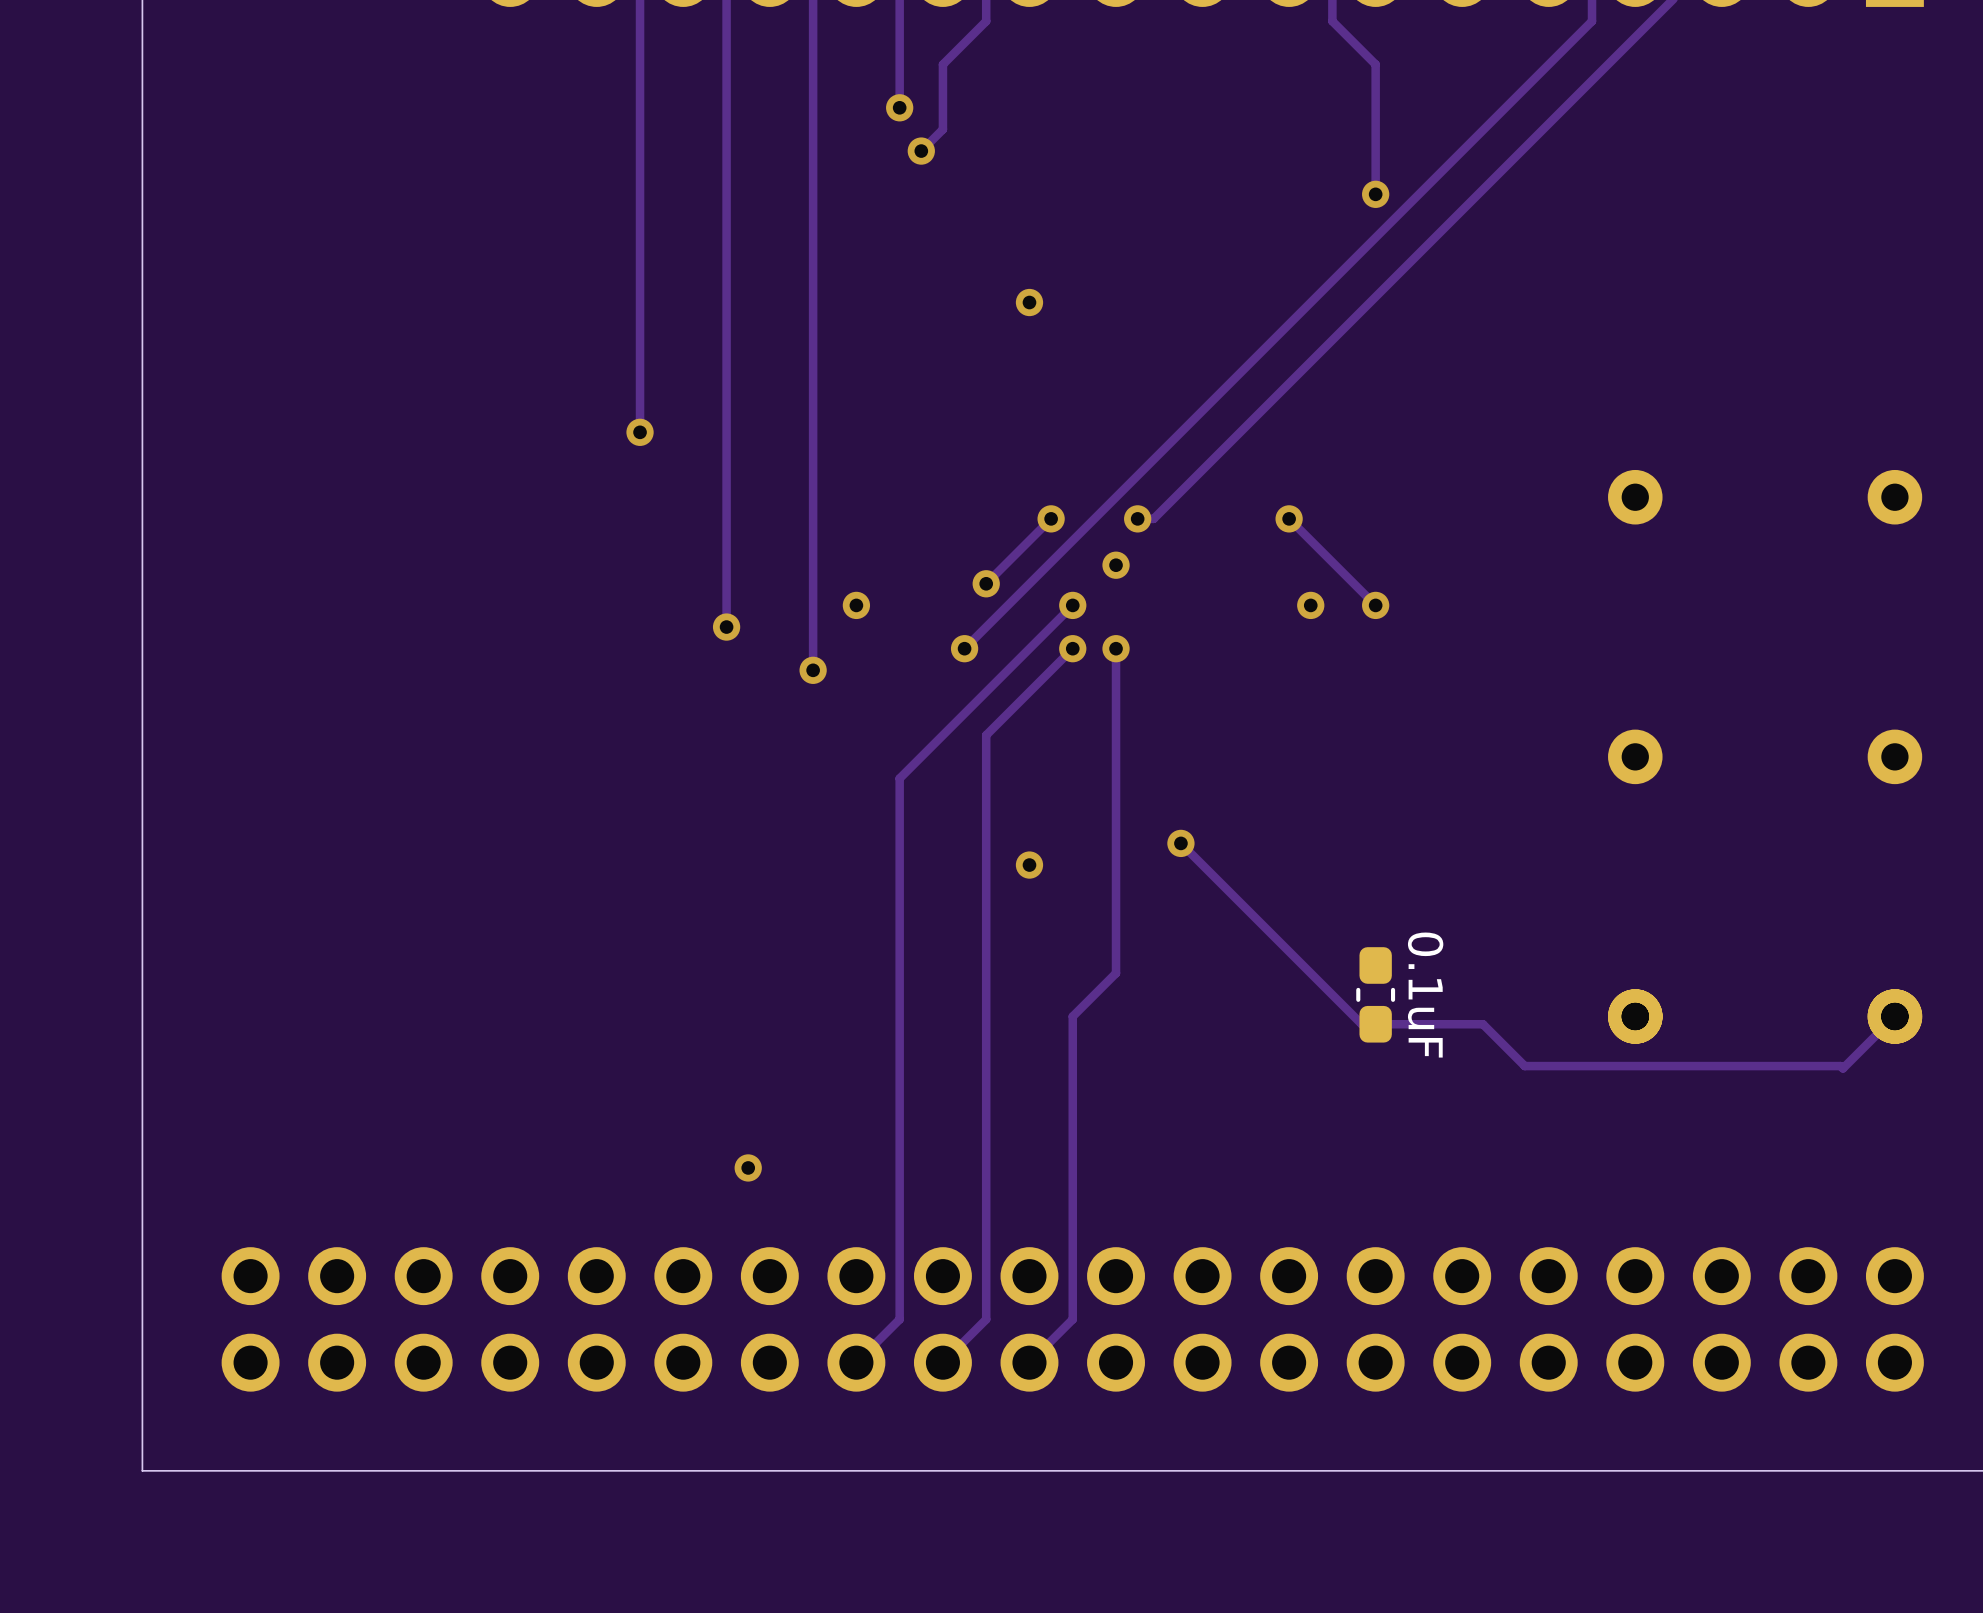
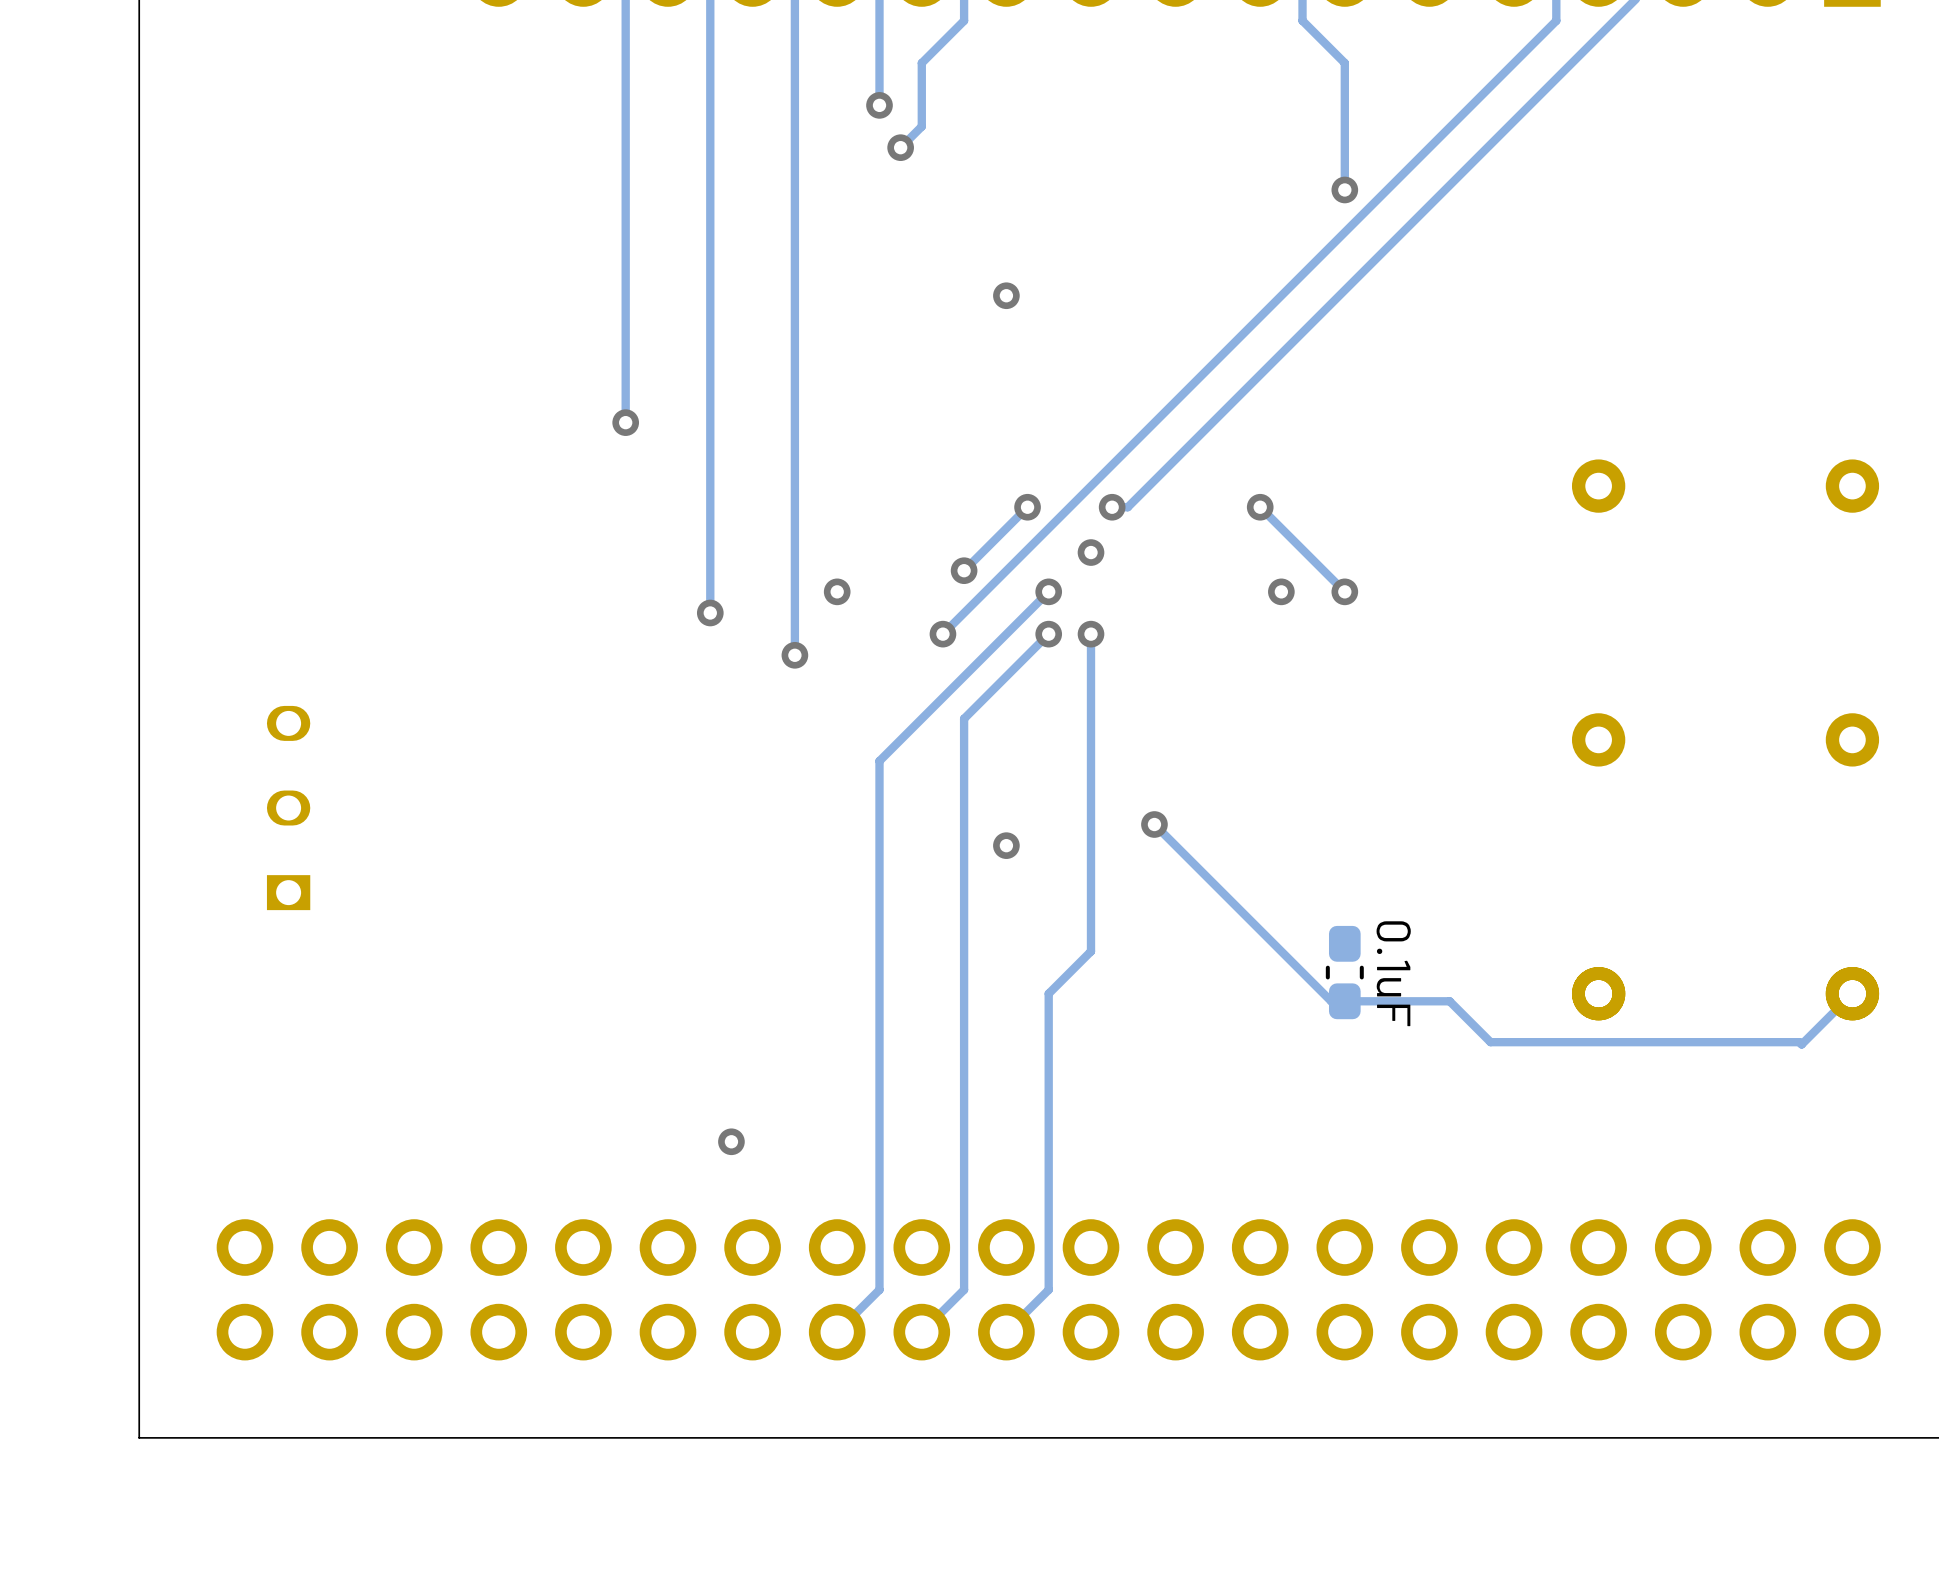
part: none -> (288, 808)

